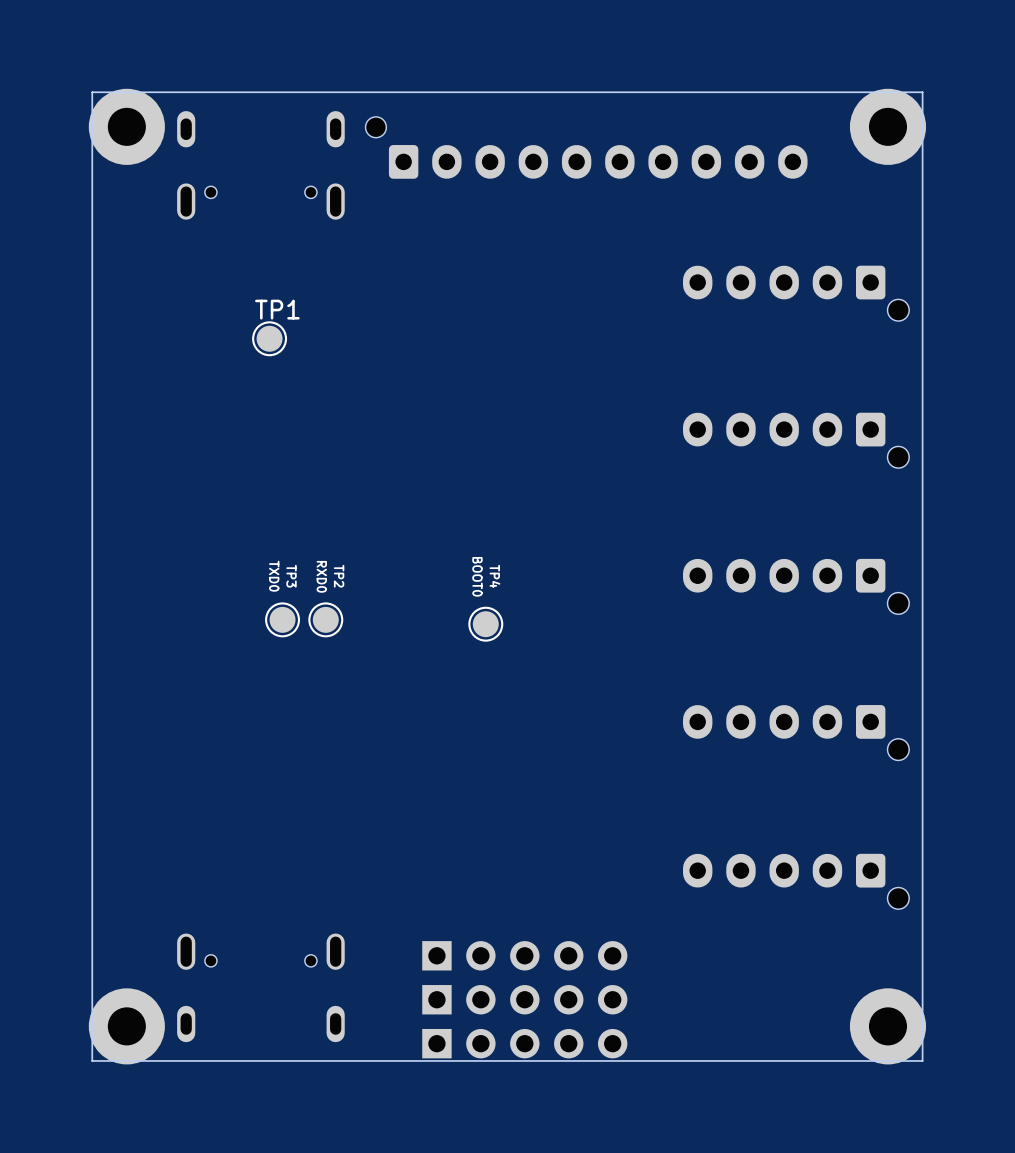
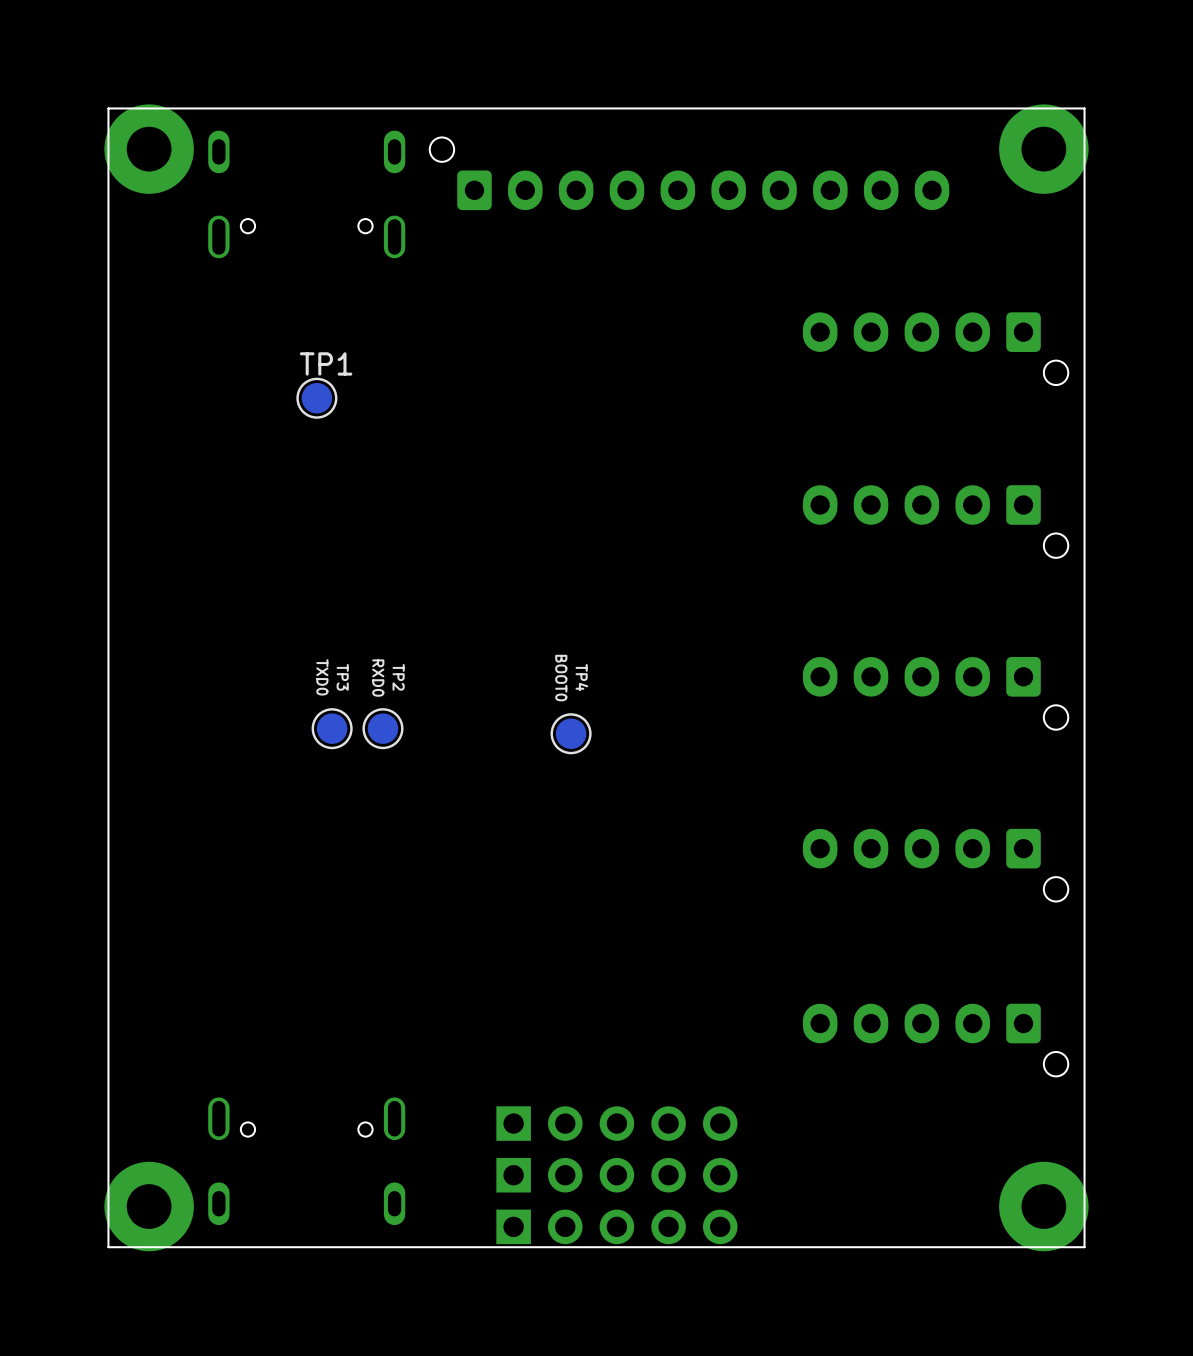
part footprint: [683, 265, 910, 322] -> [802, 312, 1069, 386]
part footprint: [683, 412, 910, 469] -> [802, 485, 1069, 558]
part footprint: [683, 558, 910, 615] -> [802, 656, 1069, 730]
part footprint: [683, 705, 910, 761] -> [802, 828, 1069, 902]
part footprint: [683, 853, 910, 910] -> [802, 1003, 1069, 1077]

